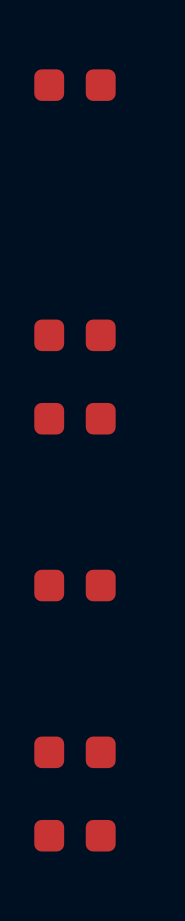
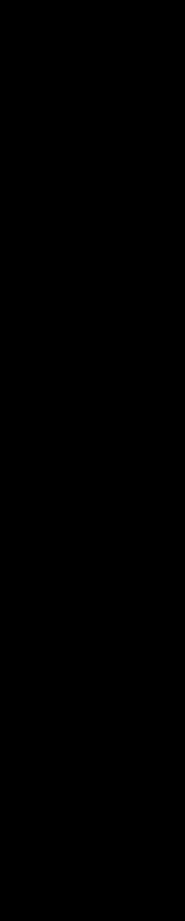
part: (74, 85) -> none
part: (74, 335) -> none
part: (74, 418) -> none
part: (74, 585) -> none
part: (74, 752) -> none
part: (74, 835) -> none

